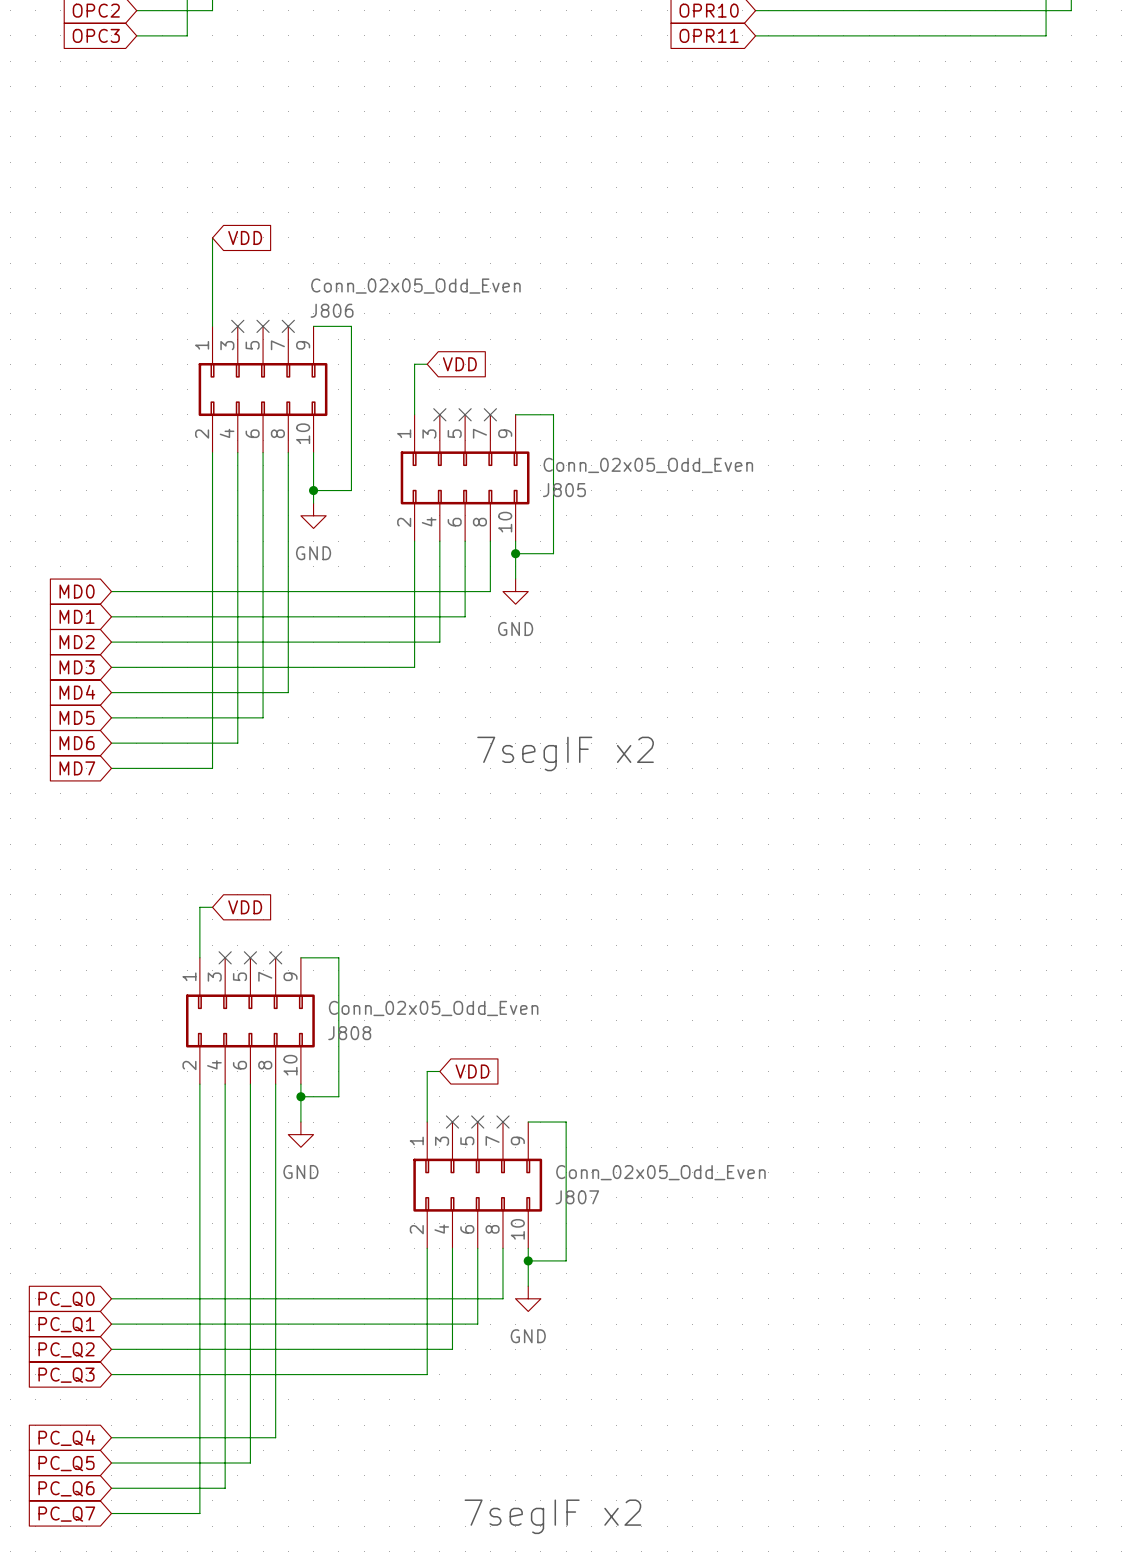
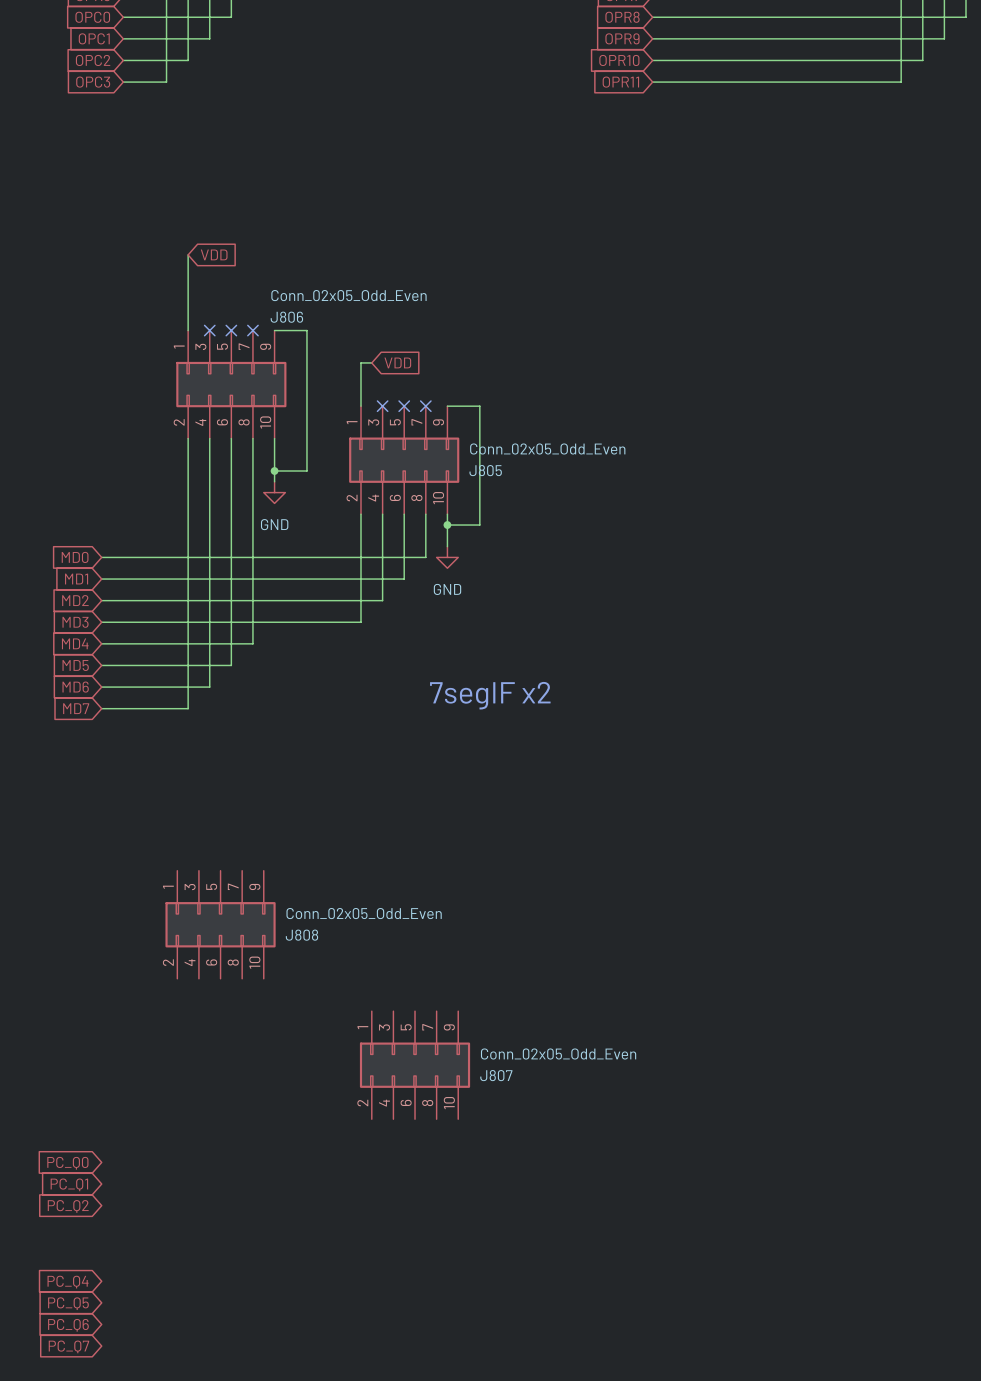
wire: (212, 907) (199, 907) (199, 957) -> none
global label: VDD (245, 907) -> none
no-connect mark: (225, 957) -> none
no-connect mark: (250, 957) -> none
no-connect mark: (275, 957) -> none
wire: (300, 957) (338, 957) (338, 1096) (300, 1096) -> none
wire: (439, 1071) (427, 1071) (427, 1122) -> none
global label: VDD (472, 1071) -> none
wire: (199, 1084) (199, 1513) (111, 1513) -> none
wire: (225, 1084) (225, 1488) (111, 1488) -> none
wire: (250, 1084) (250, 1462) (111, 1462) -> none
wire: (275, 1084) (275, 1437) (111, 1437) -> none
wire: (300, 1084) (300, 1122) -> none
junction: (300, 1096) -> none
no-connect mark: (452, 1122) -> none
no-connect mark: (477, 1122) -> none
no-connect mark: (502, 1122) -> none
wire: (528, 1122) (566, 1122) (566, 1260) (528, 1260) -> none
power symbol: GND (300, 1134) -> none
wire: (427, 1248) (427, 1374) (111, 1374) -> none
wire: (452, 1248) (452, 1349) (111, 1349) -> none
wire: (477, 1248) (477, 1324) (111, 1324) -> none
wire: (502, 1248) (502, 1298) (111, 1298) -> none
wire: (528, 1248) (528, 1286) -> none
junction: (528, 1260) -> none
power symbol: GND (528, 1298) -> none
global label: PC_Q3 (66, 1375) -> none
text: 7segIF x2 (552, 1516) -> none

